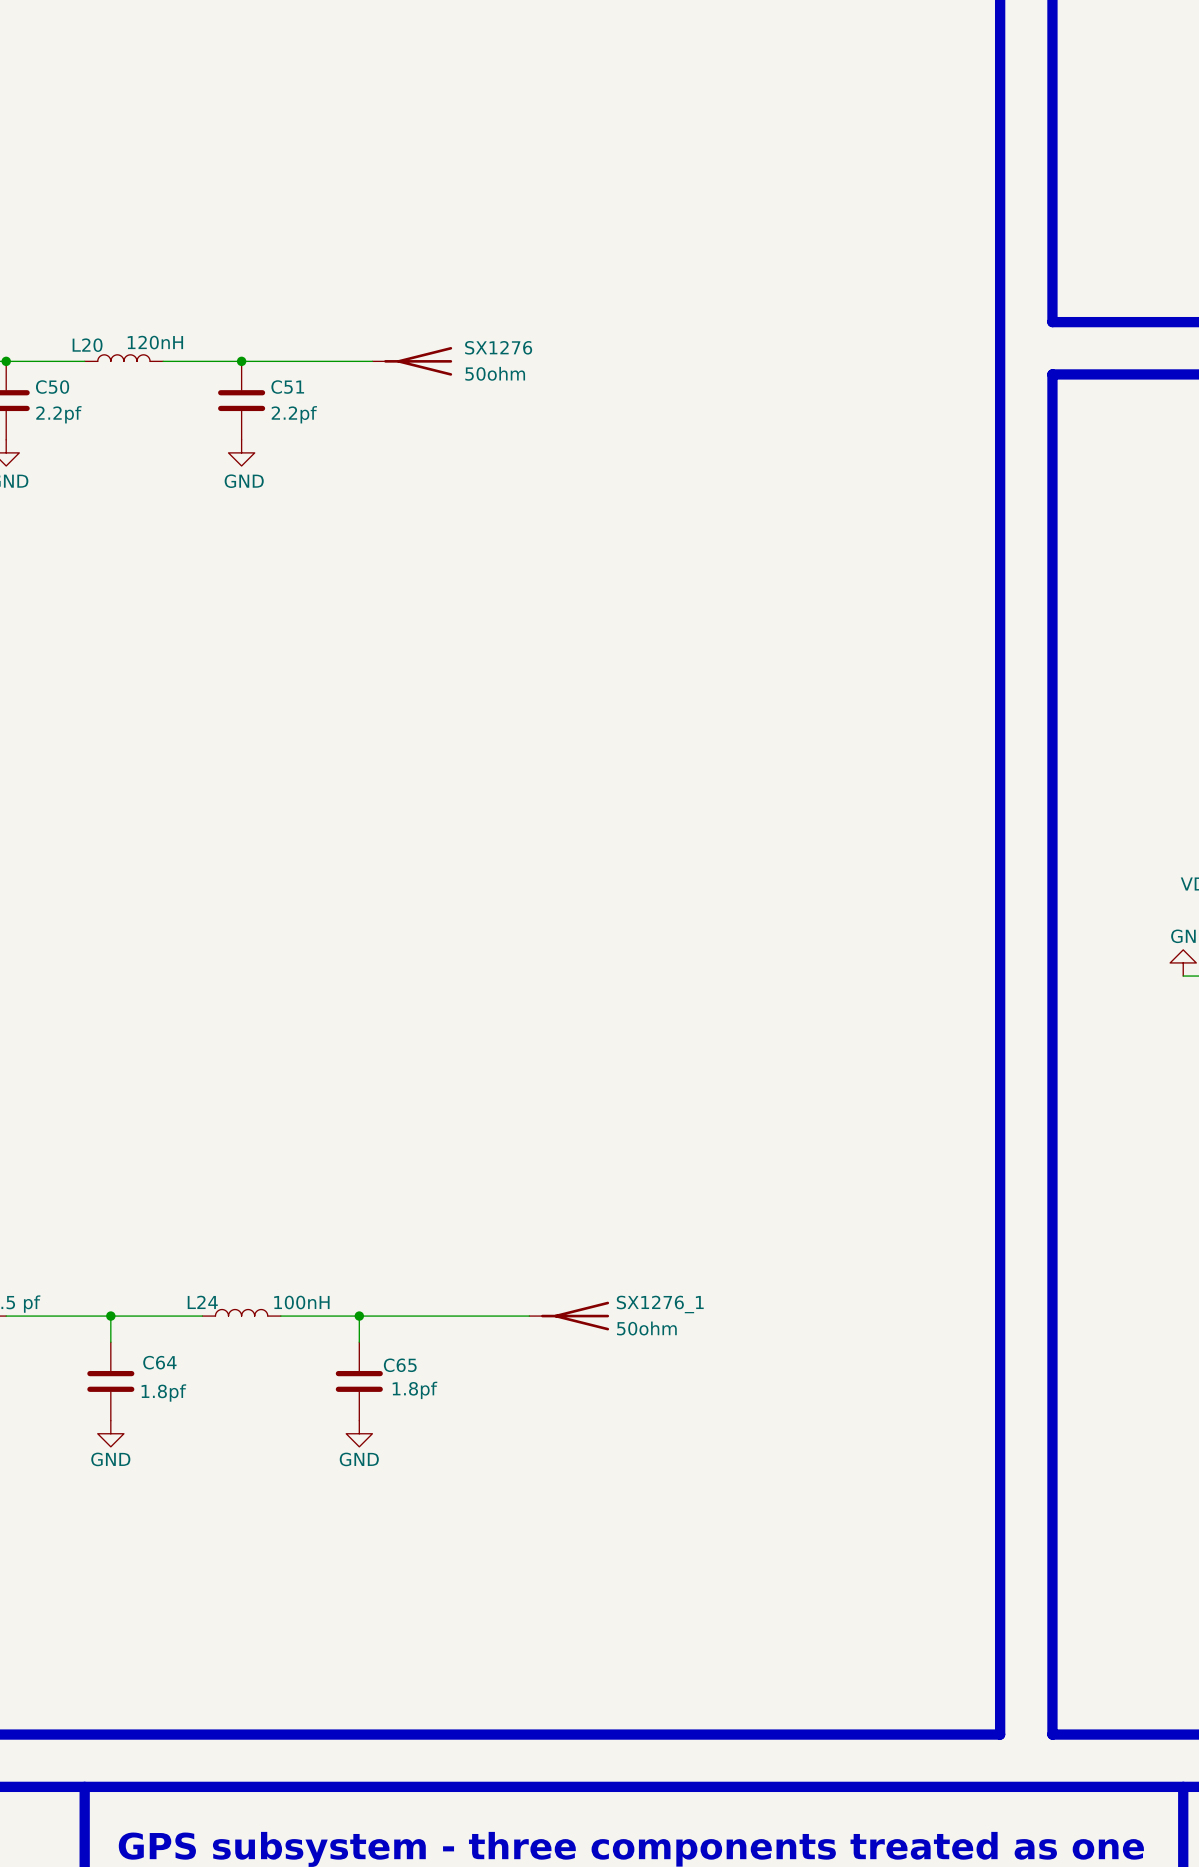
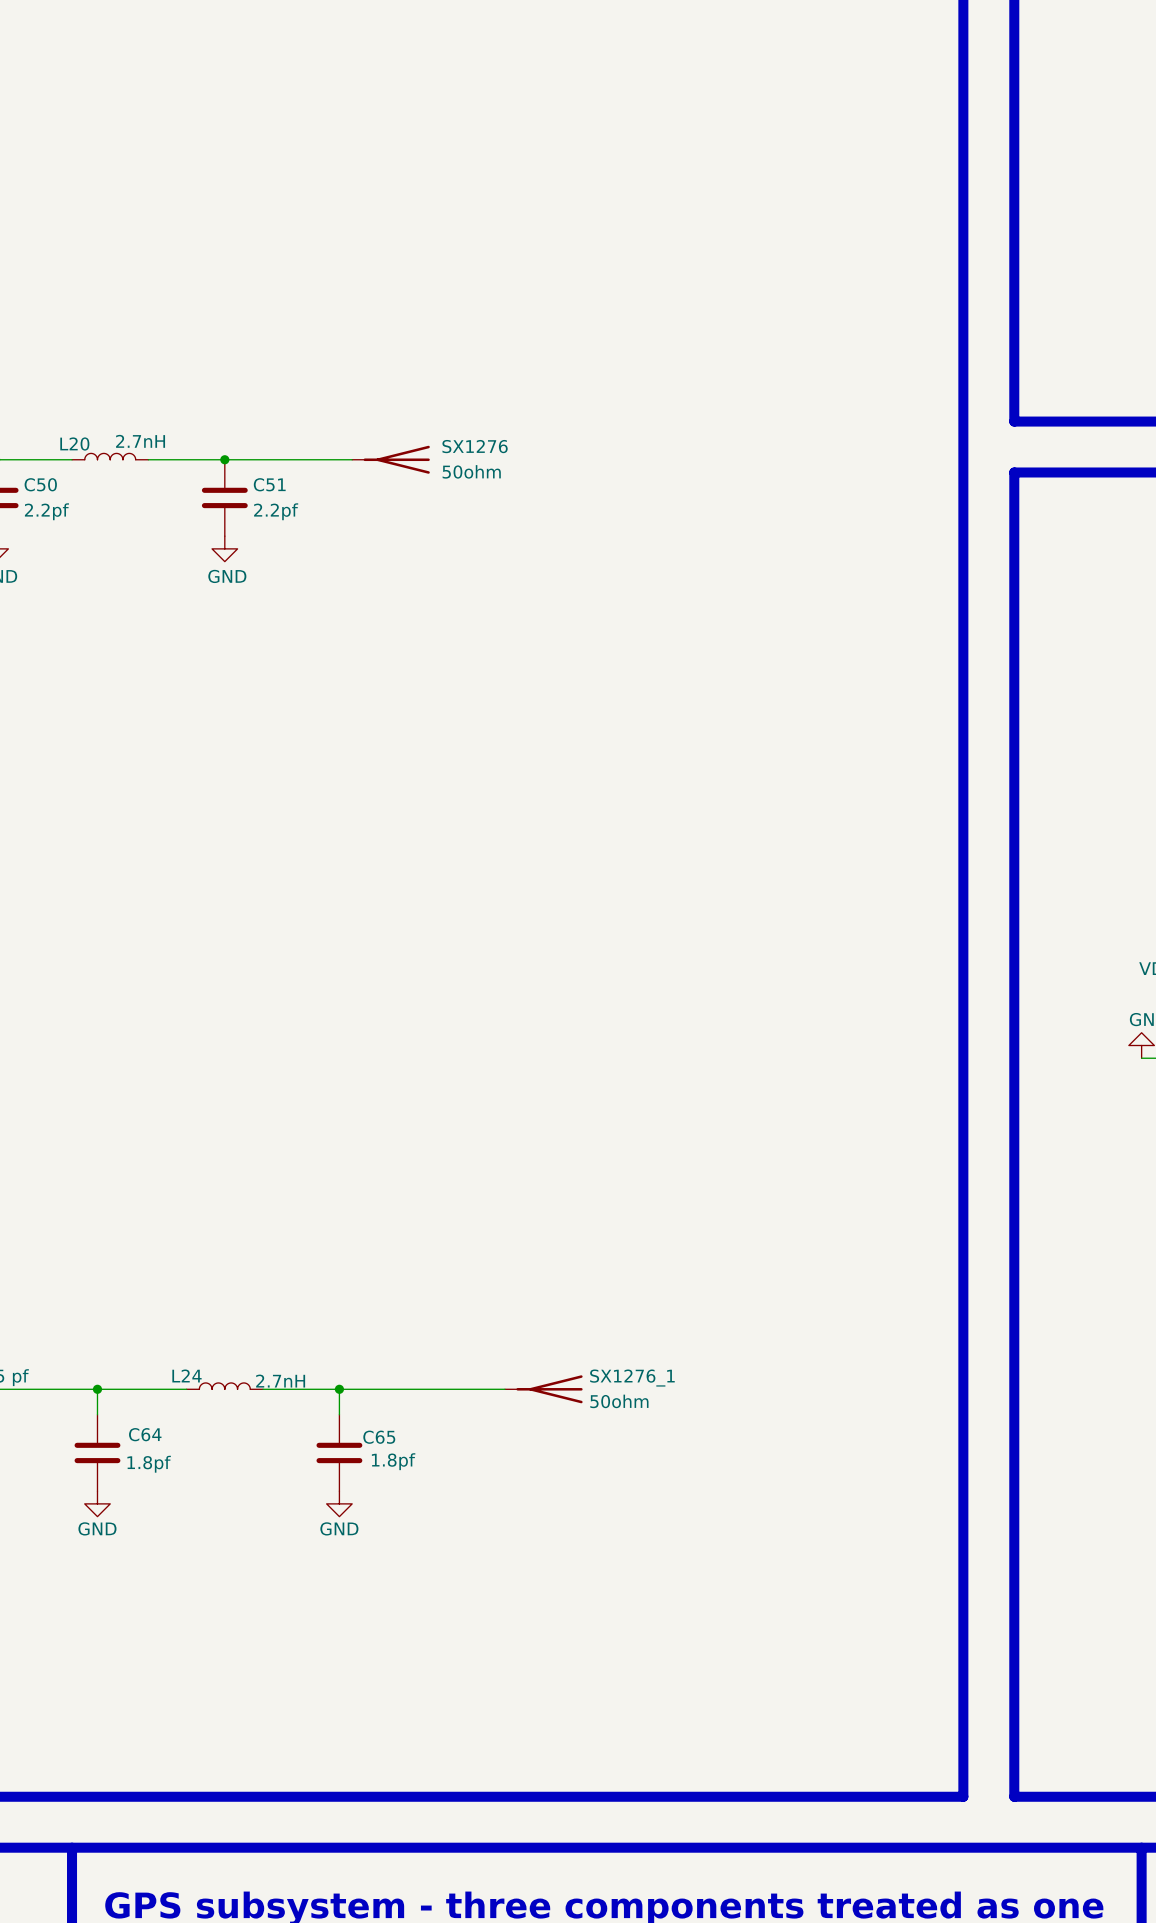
L20 value: 120nH (155, 342) -> 2.7nH (140, 441)
L24 value: 100nH (301, 1302) -> 2.7nH (280, 1381)

